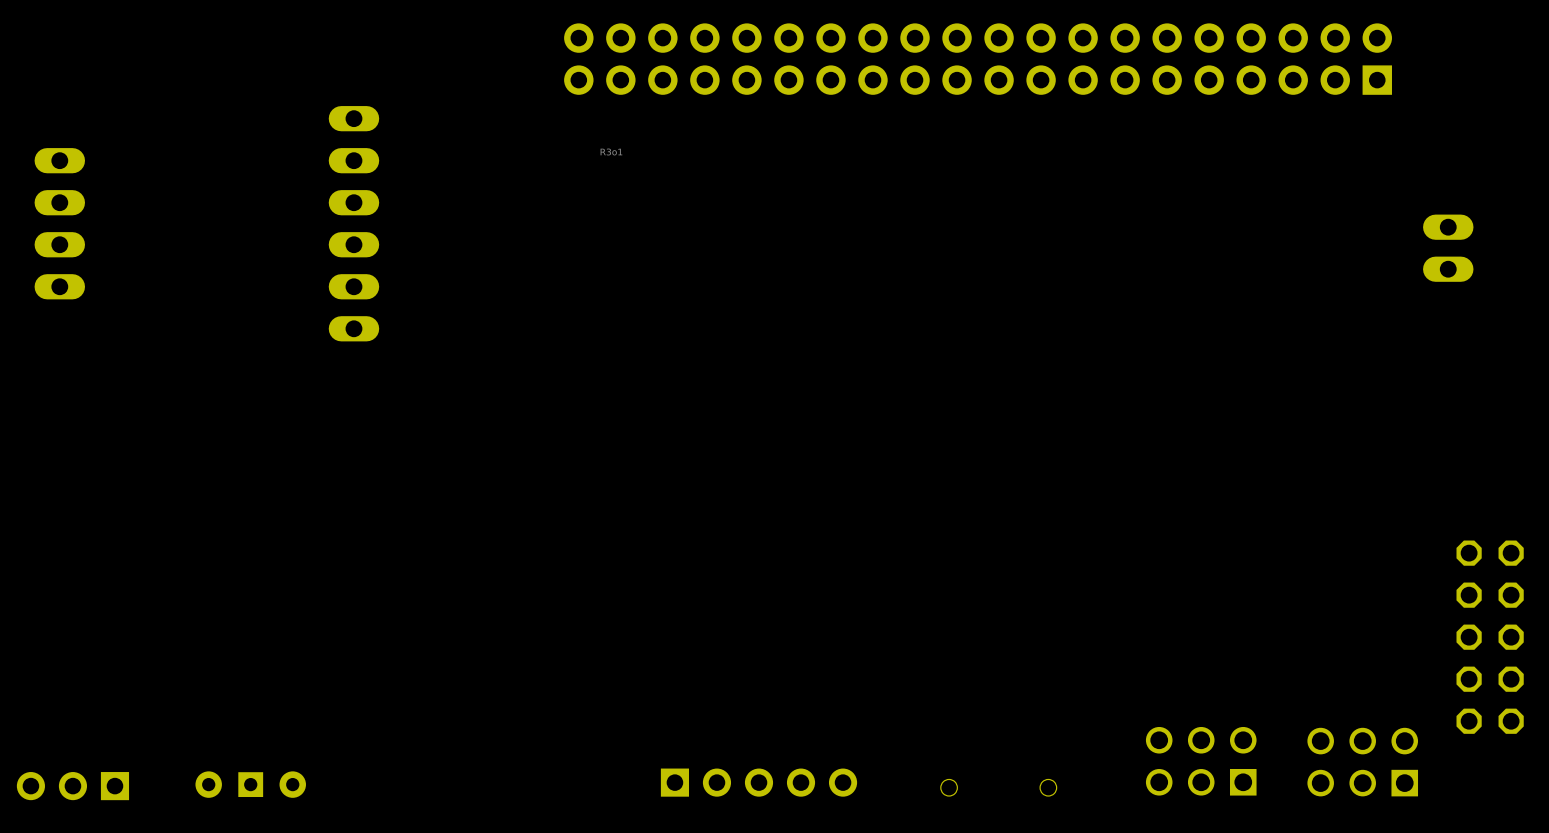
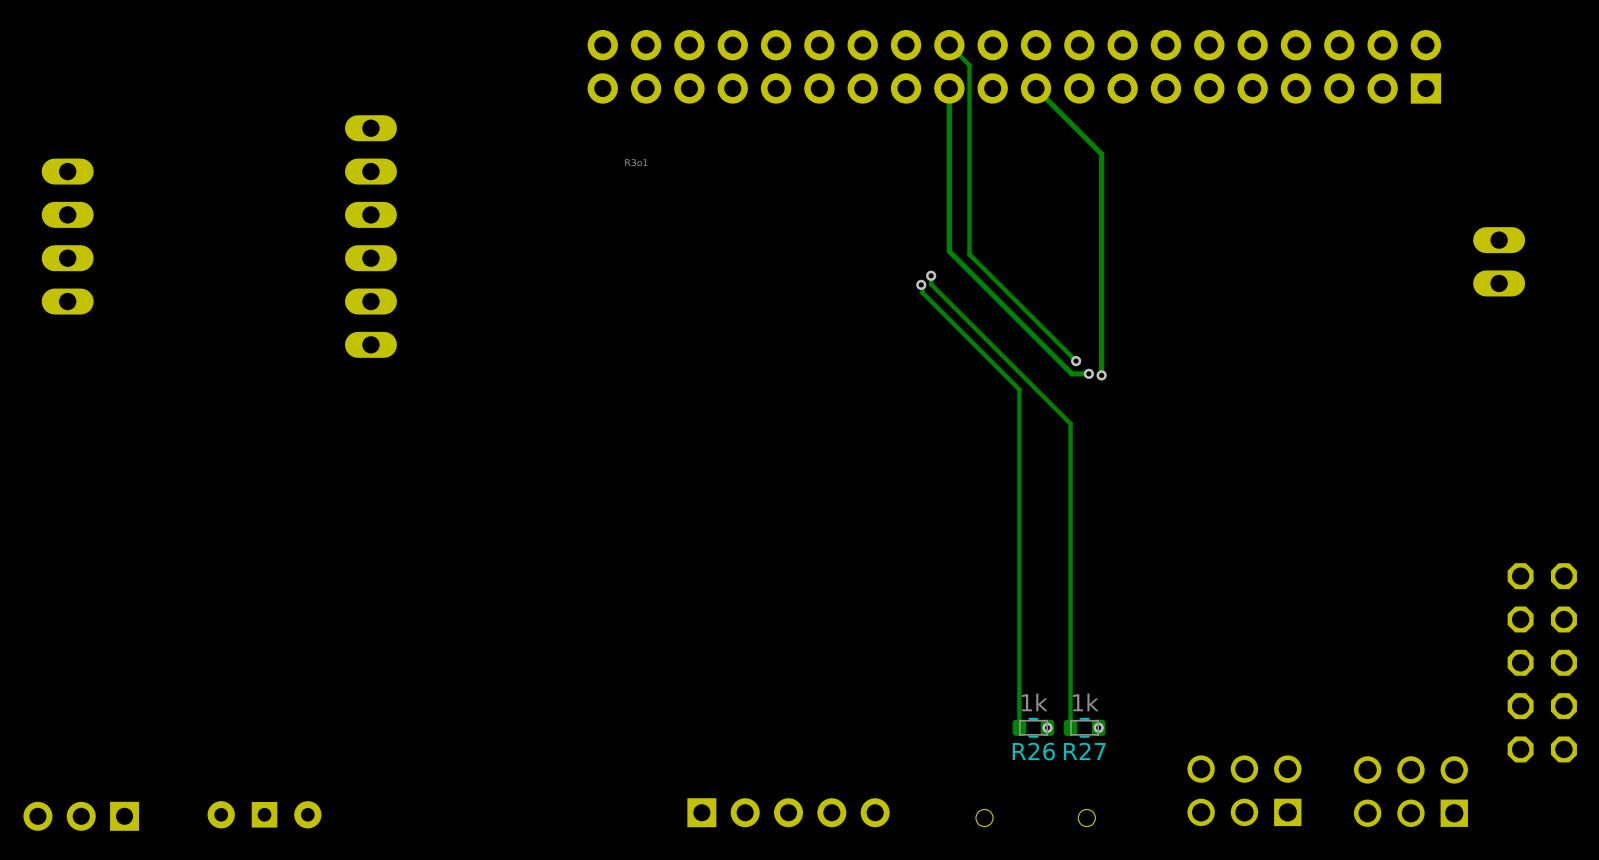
track: none -> (949, 45) (969, 65) (969, 254) (1076, 361)
track: none -> (949, 88) (949, 251) (1071, 373) (1088, 373)
track: none -> (1036, 88) (1101, 154) (1101, 375)
track: none -> (931, 275) (931, 284) (1070, 423) (1070, 727)
via: none -> (931, 275)
via: none -> (921, 284)
track: none -> (922, 284) (922, 292) (1019, 389) (1019, 727)
via: none -> (1076, 361)
via: none -> (1088, 373)
via: none -> (1101, 375)
R26: none -> 1k (1033, 727)
via: none -> (1047, 727)
R27: none -> 1k (1084, 727)
via: none -> (1098, 727)

